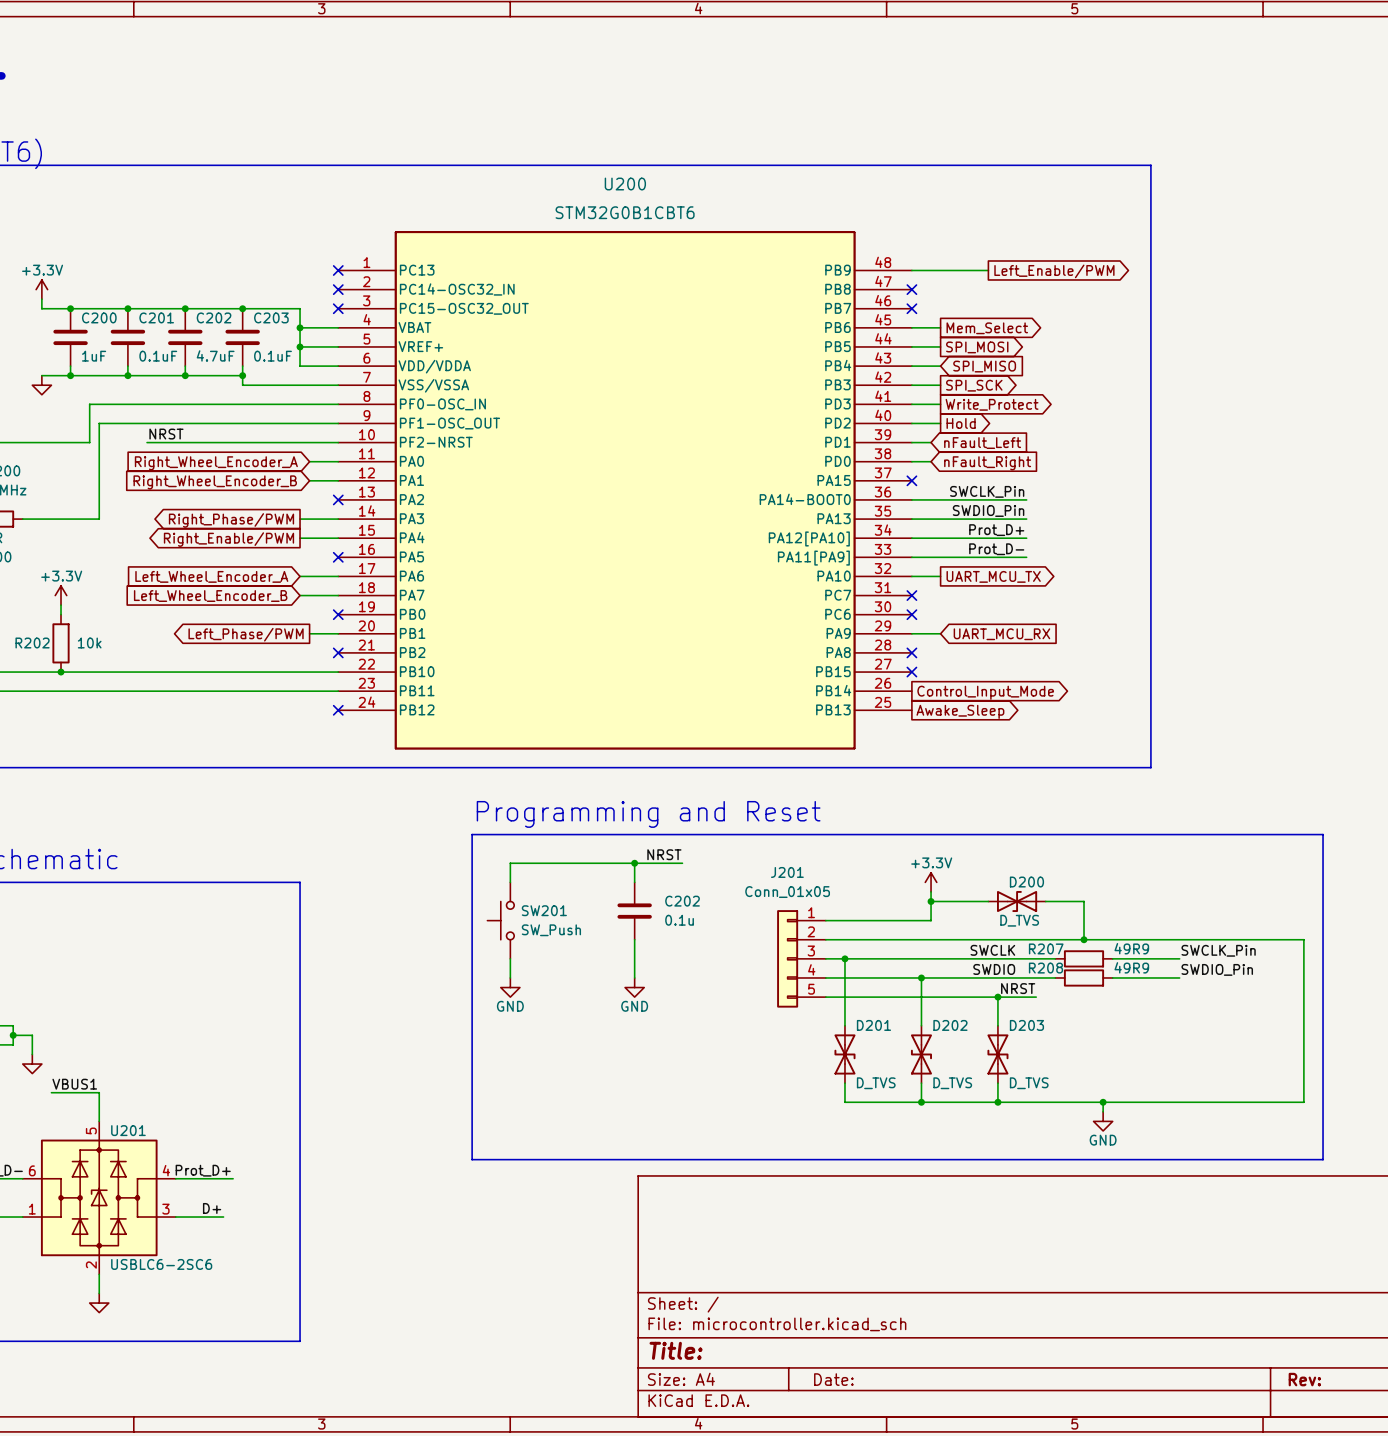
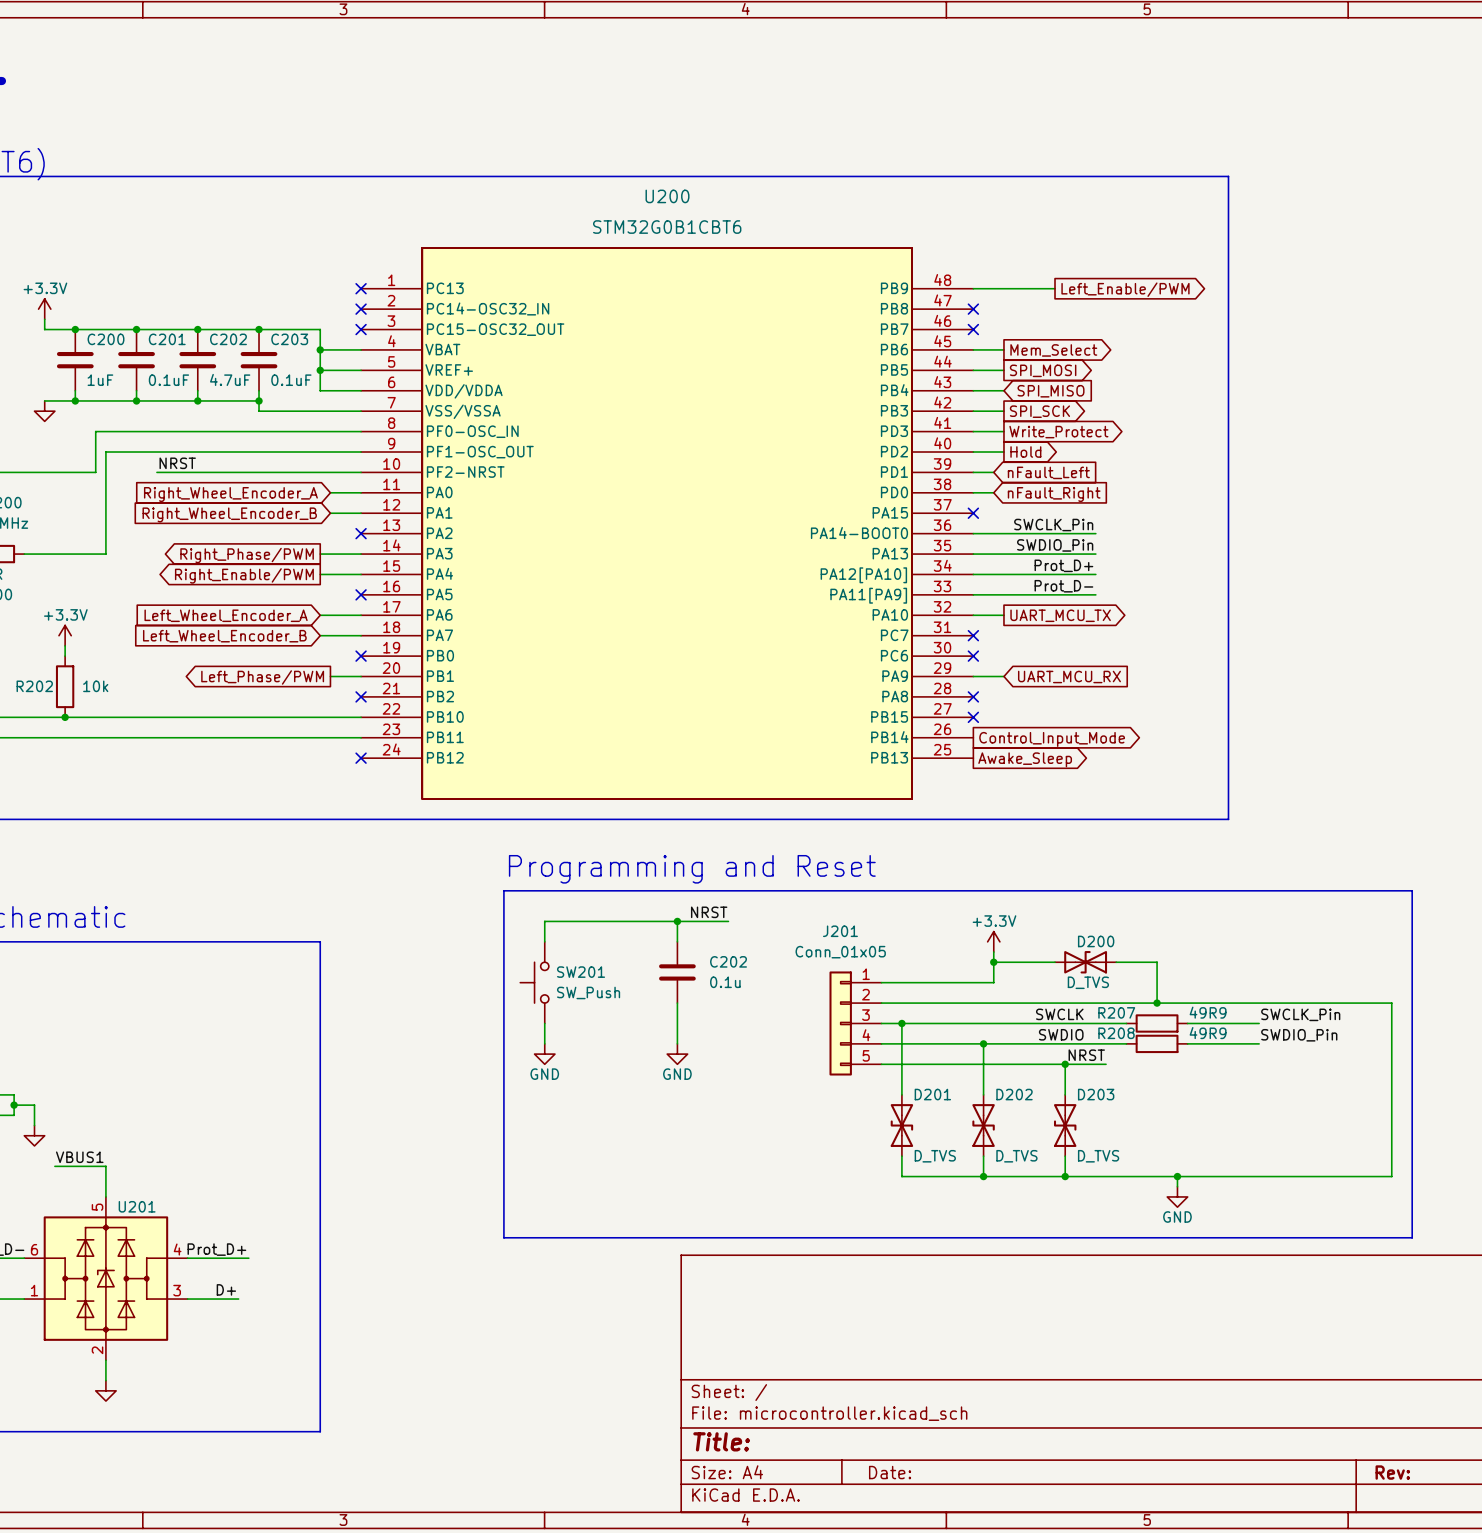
U201 value: USBLC6-2SC6 (161, 1264) -> none

